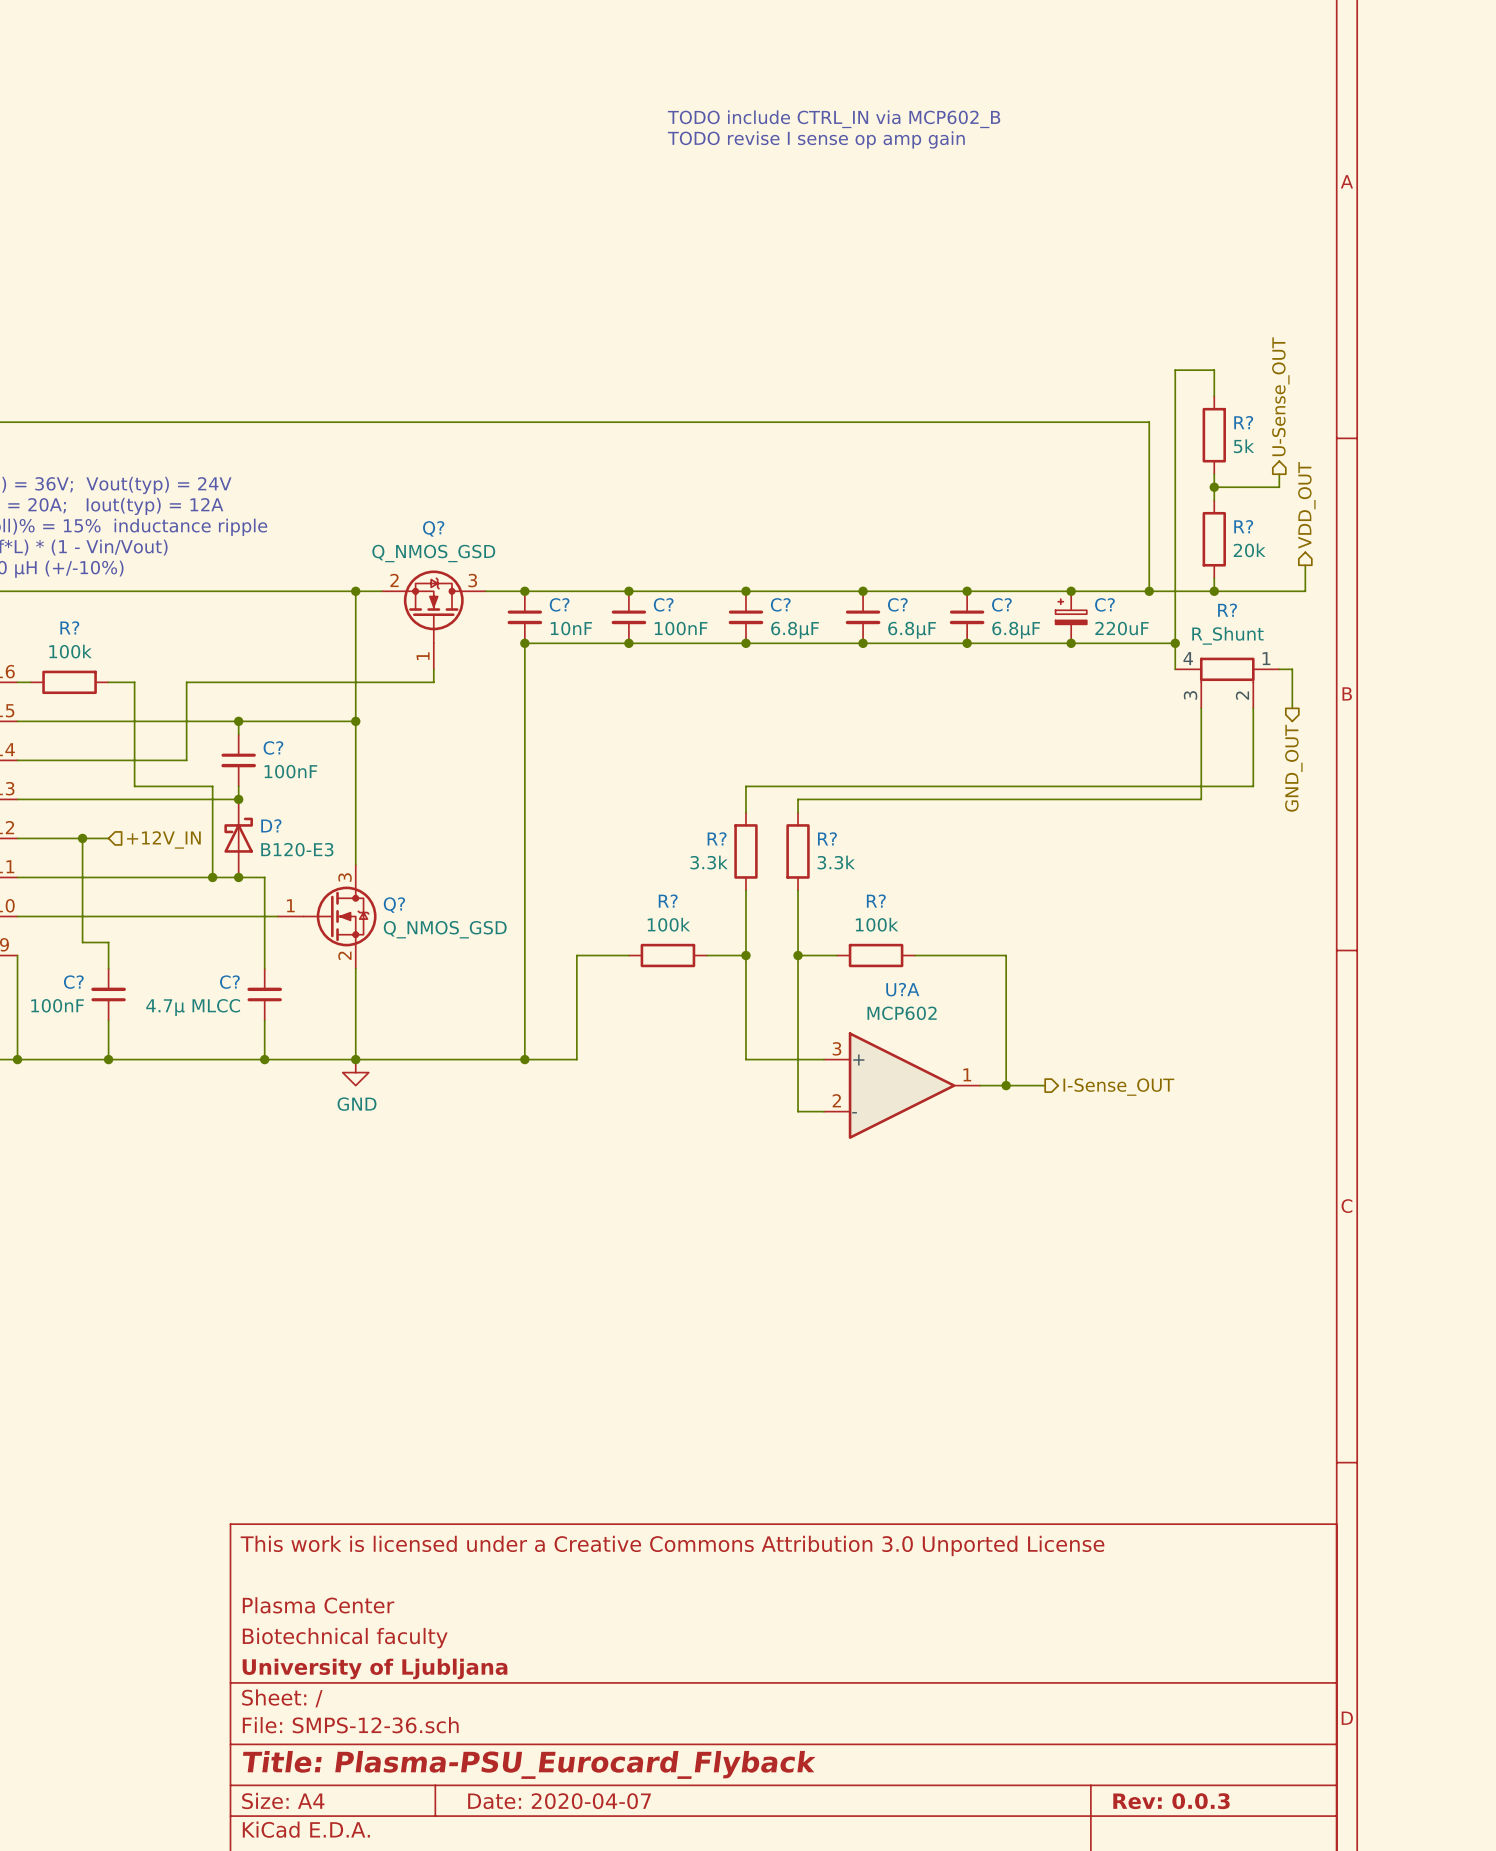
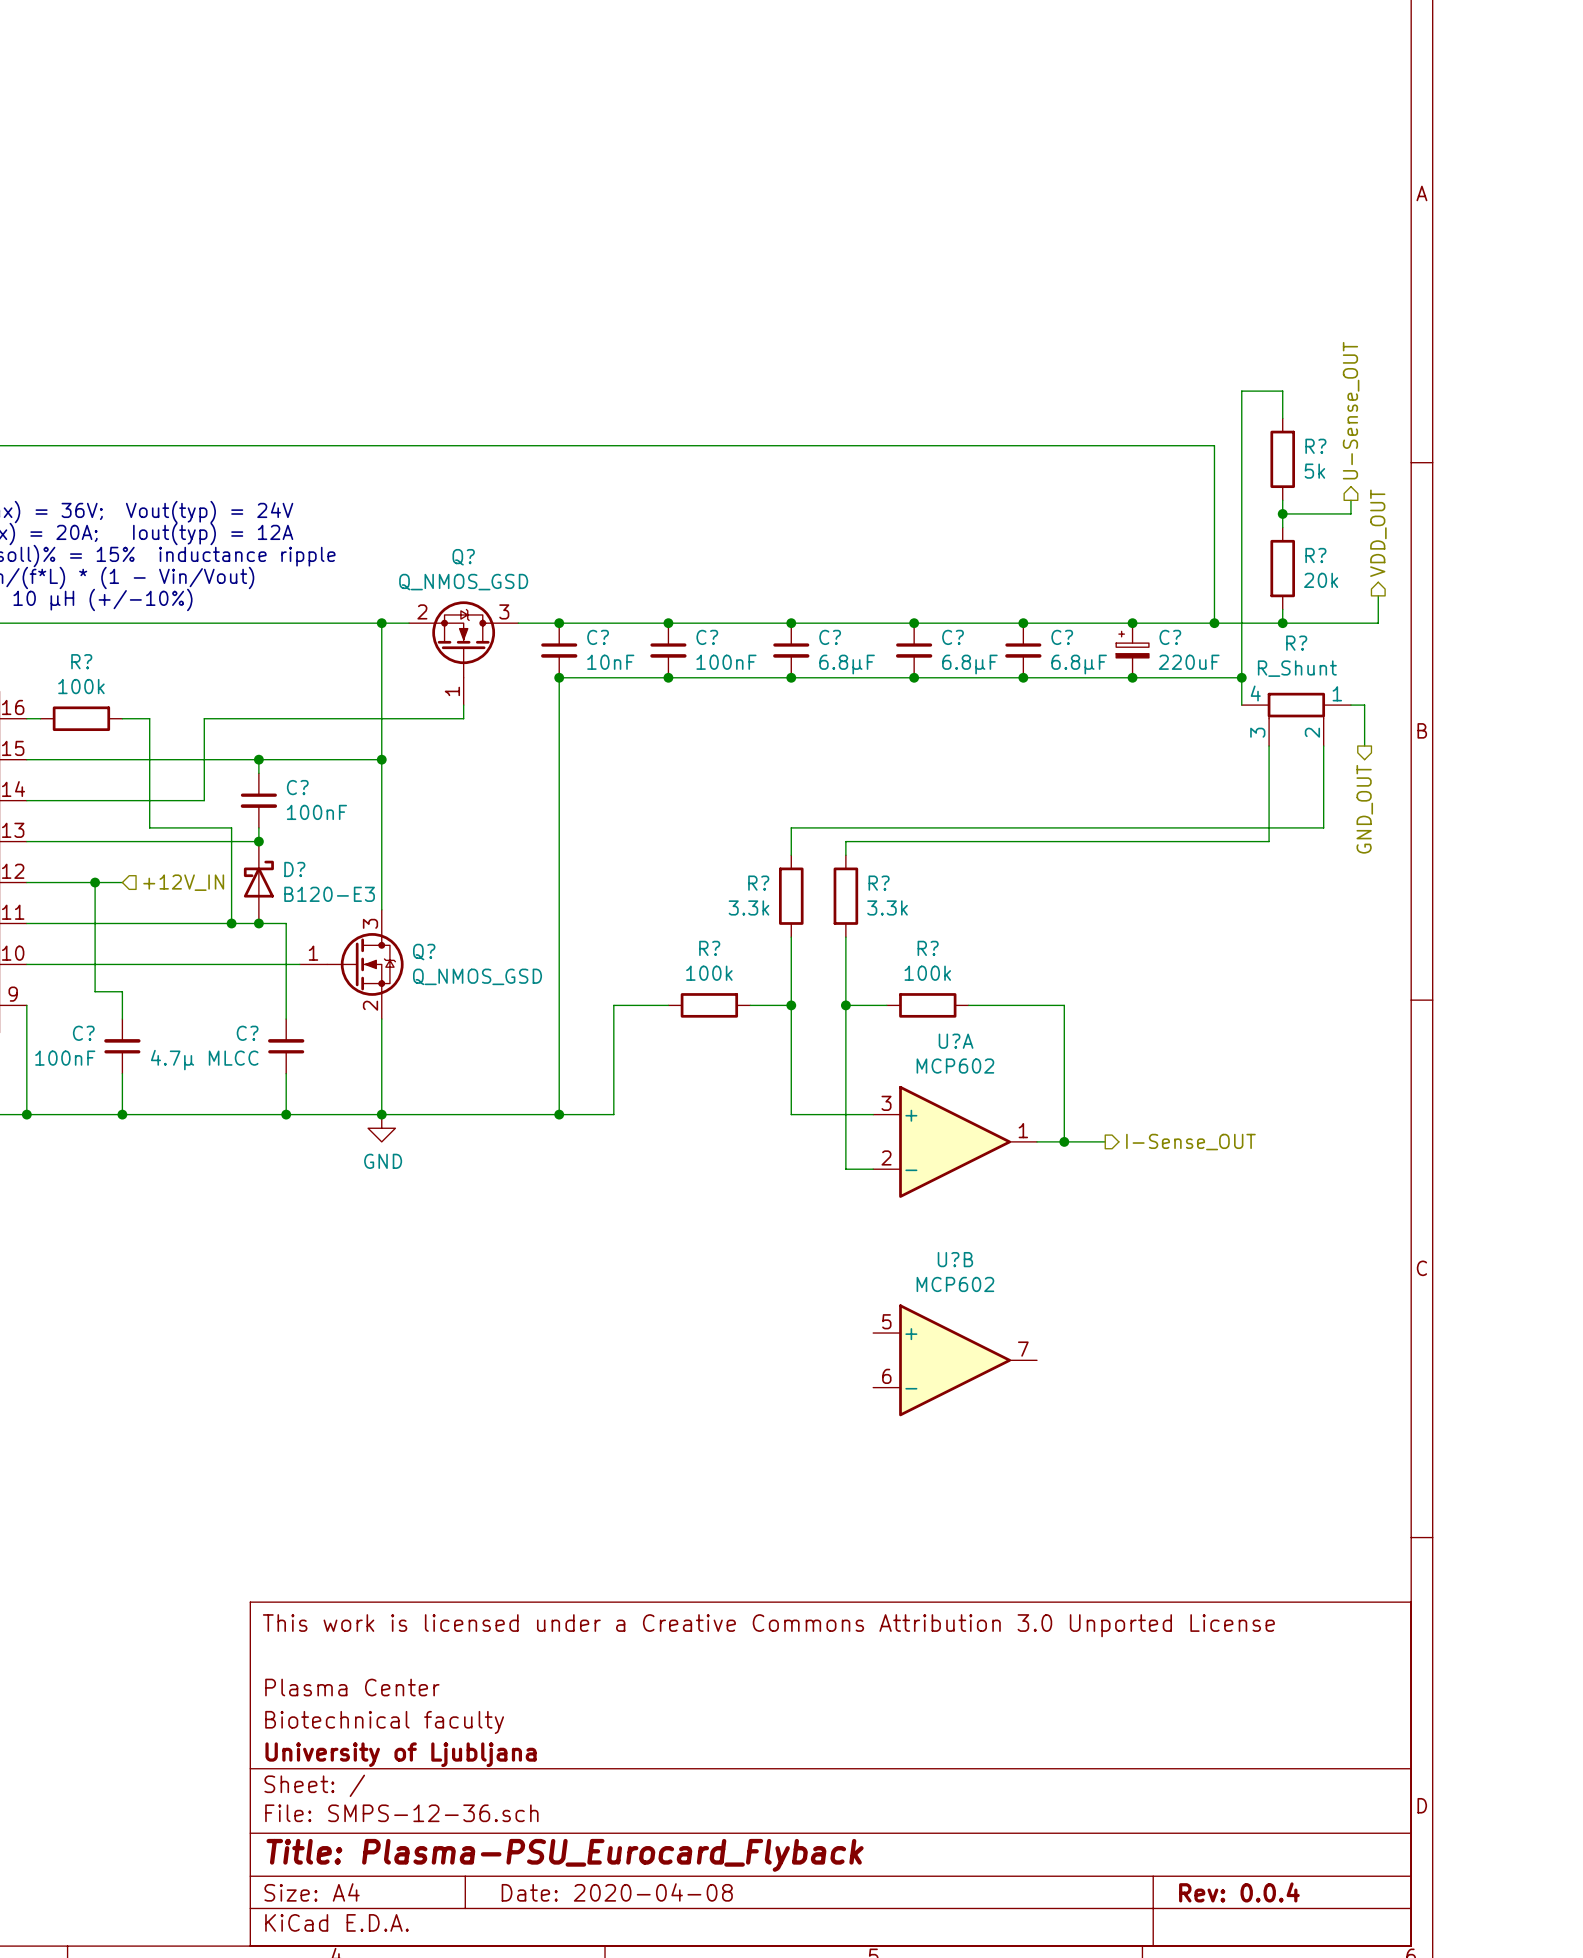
text: TODO include CTRL_IN via MCP602_B (834, 119) -> none
text: TODO revise I sense op amp gain (816, 139) -> none
U?B: none -> MCP602 (955, 1360)
title block: Date: 2020-04-07 (559, 1801) -> Date: 2020-04-08 (617, 1892)
title block: Rev: 0.0.3 (1171, 1801) -> Rev: 0.0.4 (1239, 1892)

